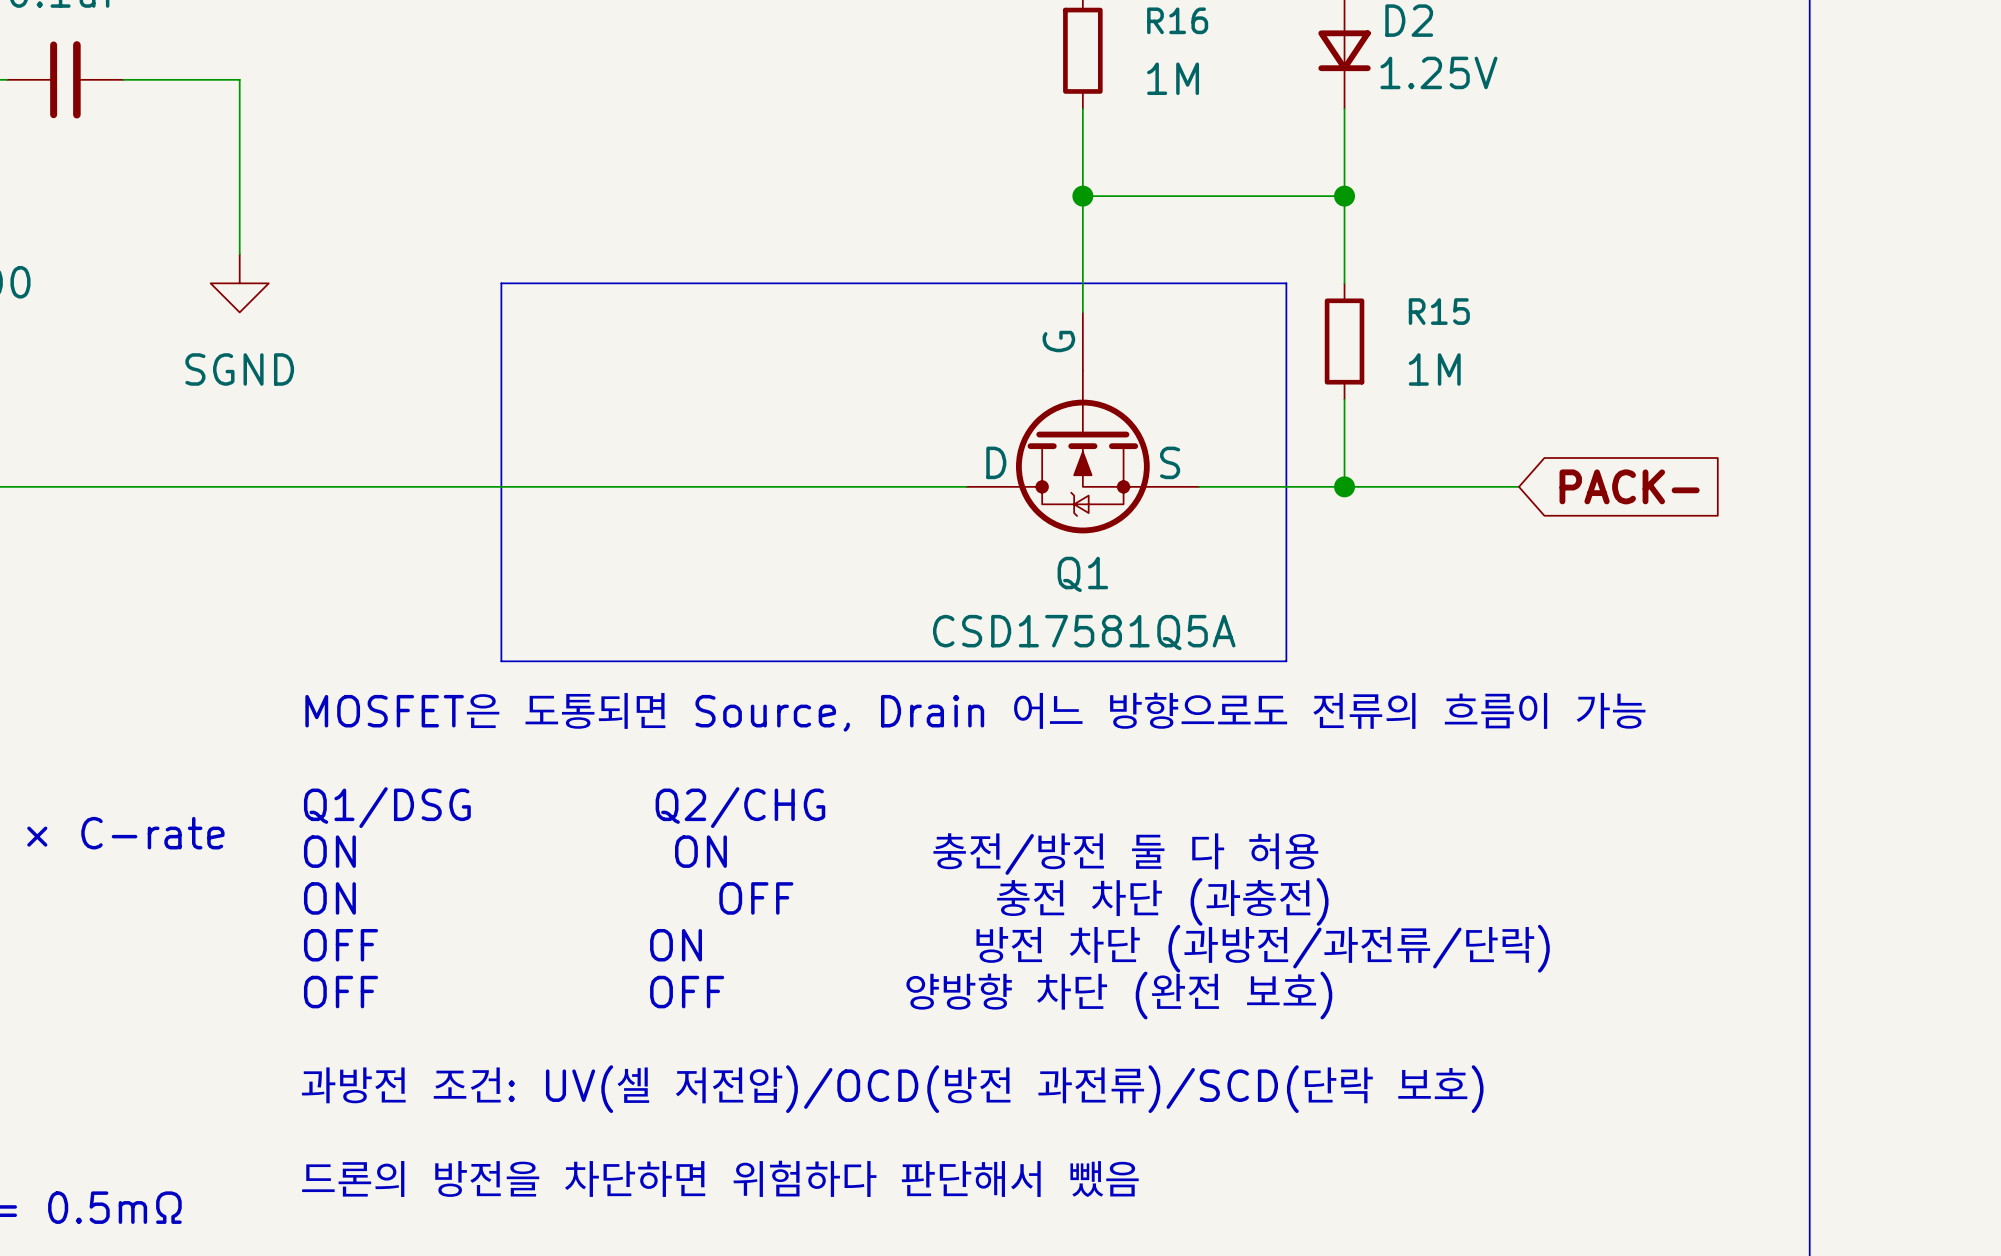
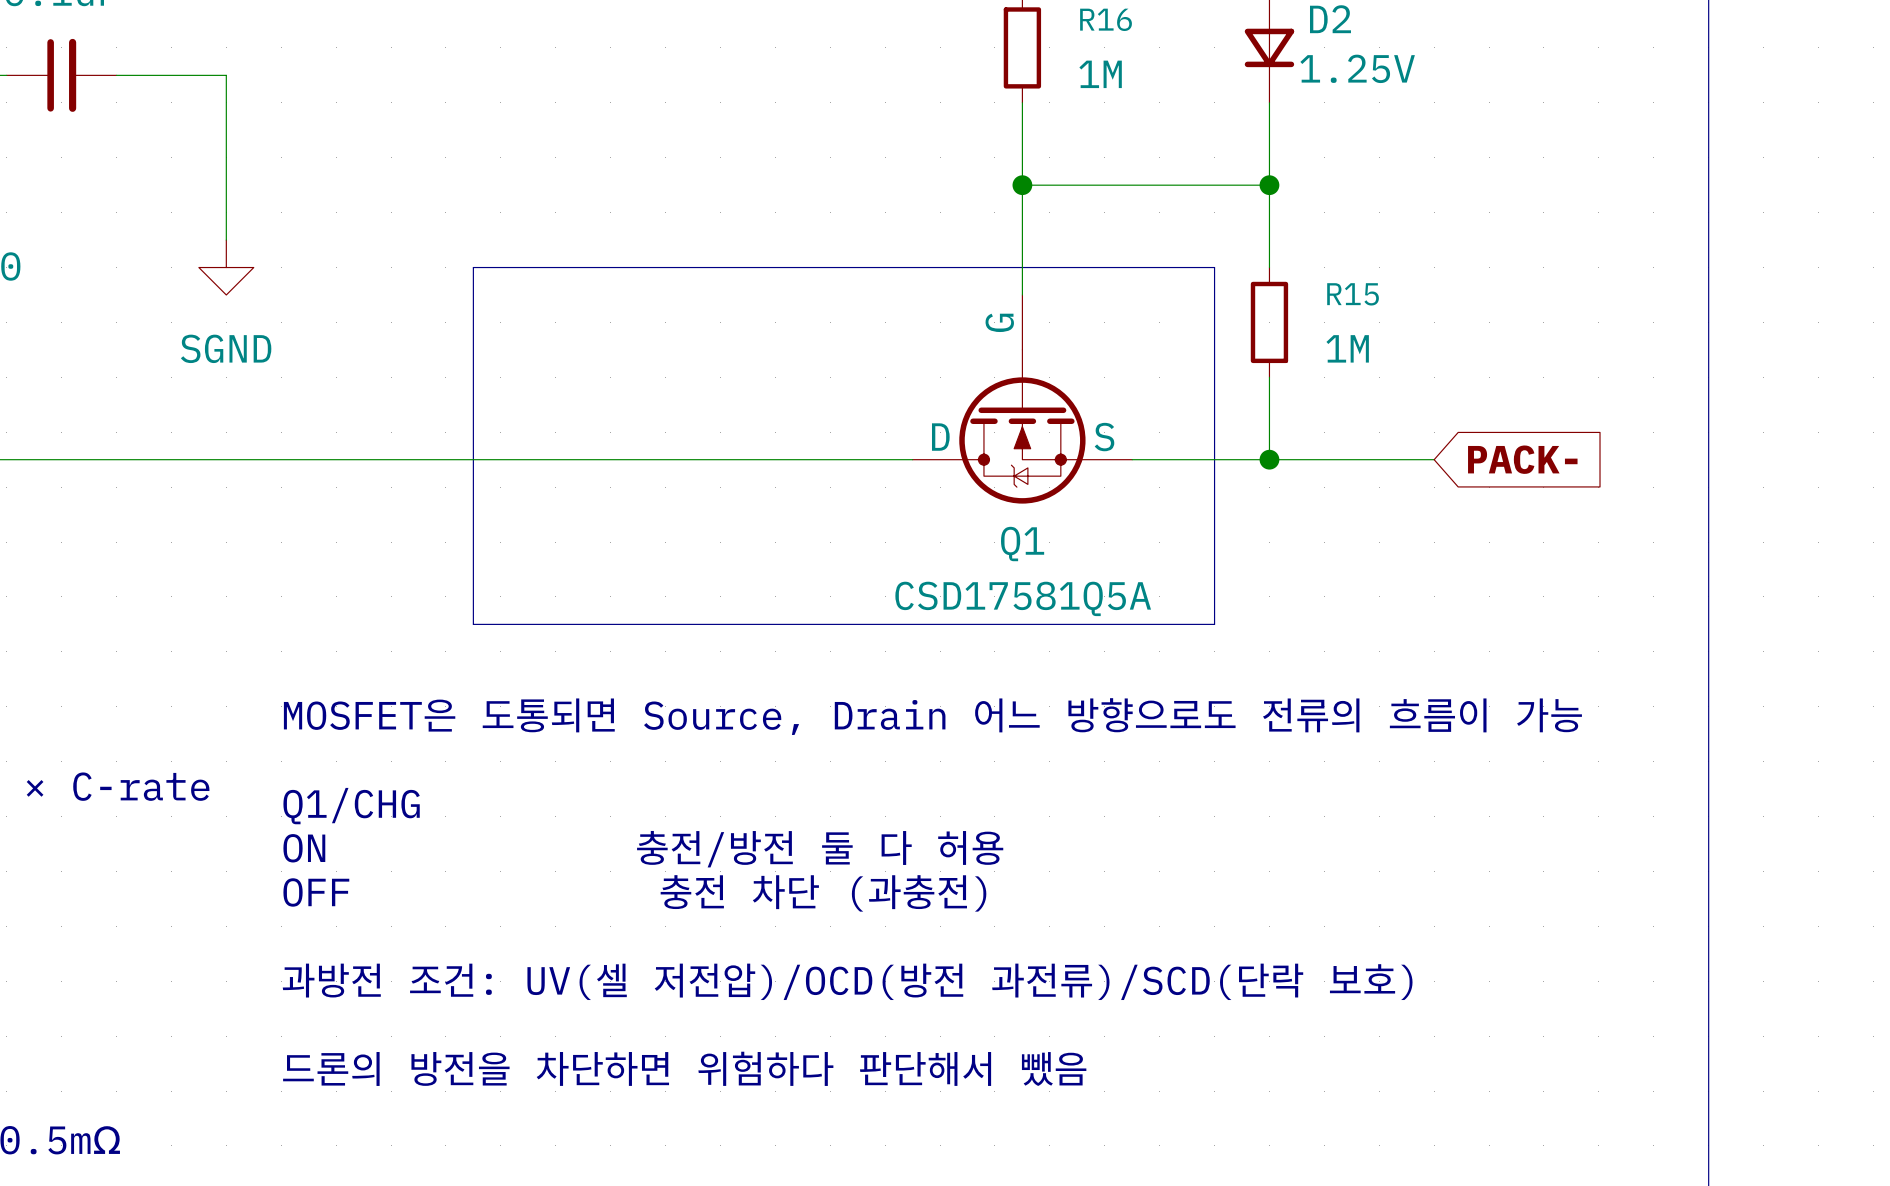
text position: MOSFET은 도통되면 Source, Drain 어느 방향으로도 전류의 흐름이 가능 (976, 711) -> MOSFET은 도통되면 Source, Drain 어느 방향으로도 전류의 흐름이 가능 (932, 716)
text: Q1/DSG Q2/CHG (564, 807) -> none
text: ON ON 충전/방전 둘 다 허용 (811, 853) -> Q1/CHG (351, 806)
text: ON OFF 충전 차단 (과충전) (816, 901) -> ON 충전/방전 둘 다 허용 (643, 849)
text: OFF ON 방전 차단 (과방전/과전류/단락) (926, 948) -> OFF 충전 차단 (과충전) (634, 893)
text: OFF OFF 양방향 차단 (완전 보호) (818, 995) -> none
text position: 과방전 조건: UV(셀 저전압)/OCD(방전 과전류)/SCD(단락 보호) (891, 1089) -> 과방전 조건: UV(셀 저전압)/OCD(방전 과전류)/SCD(단락 보호) (847, 981)
text position: 드론의 방전을 차단하면 위험하다 판단해서 뺐음 (720, 1178) -> 드론의 방전을 차단하면 위험하다 판단해서 뺐음 (684, 1068)

